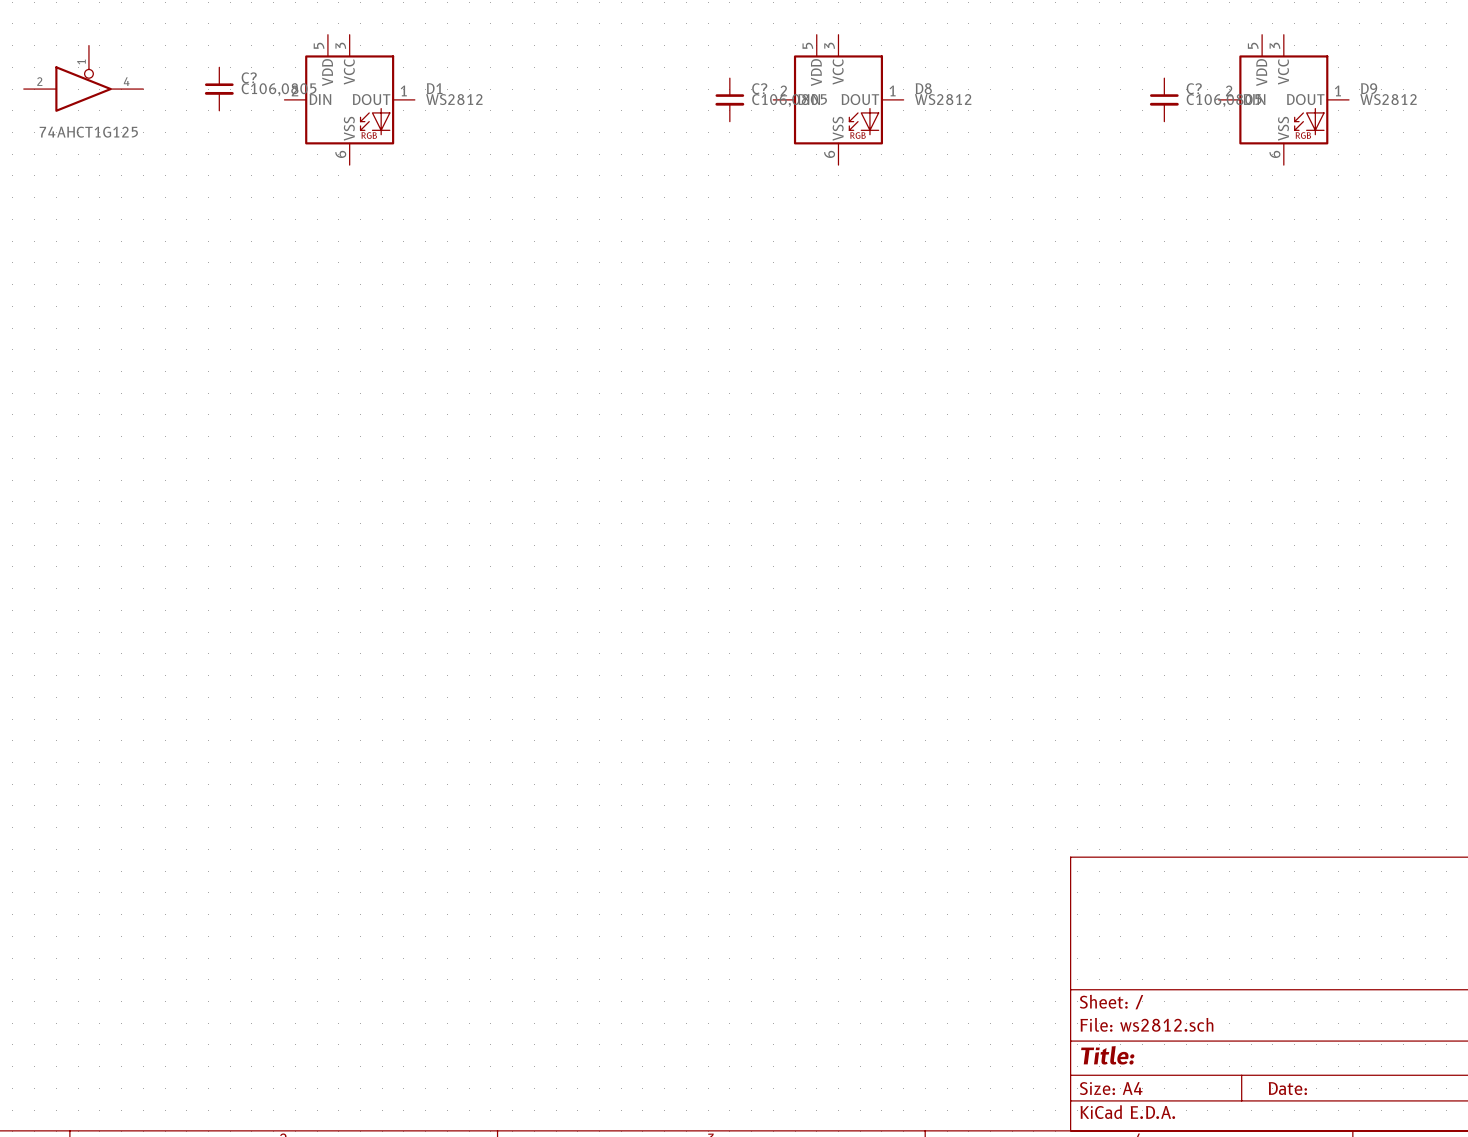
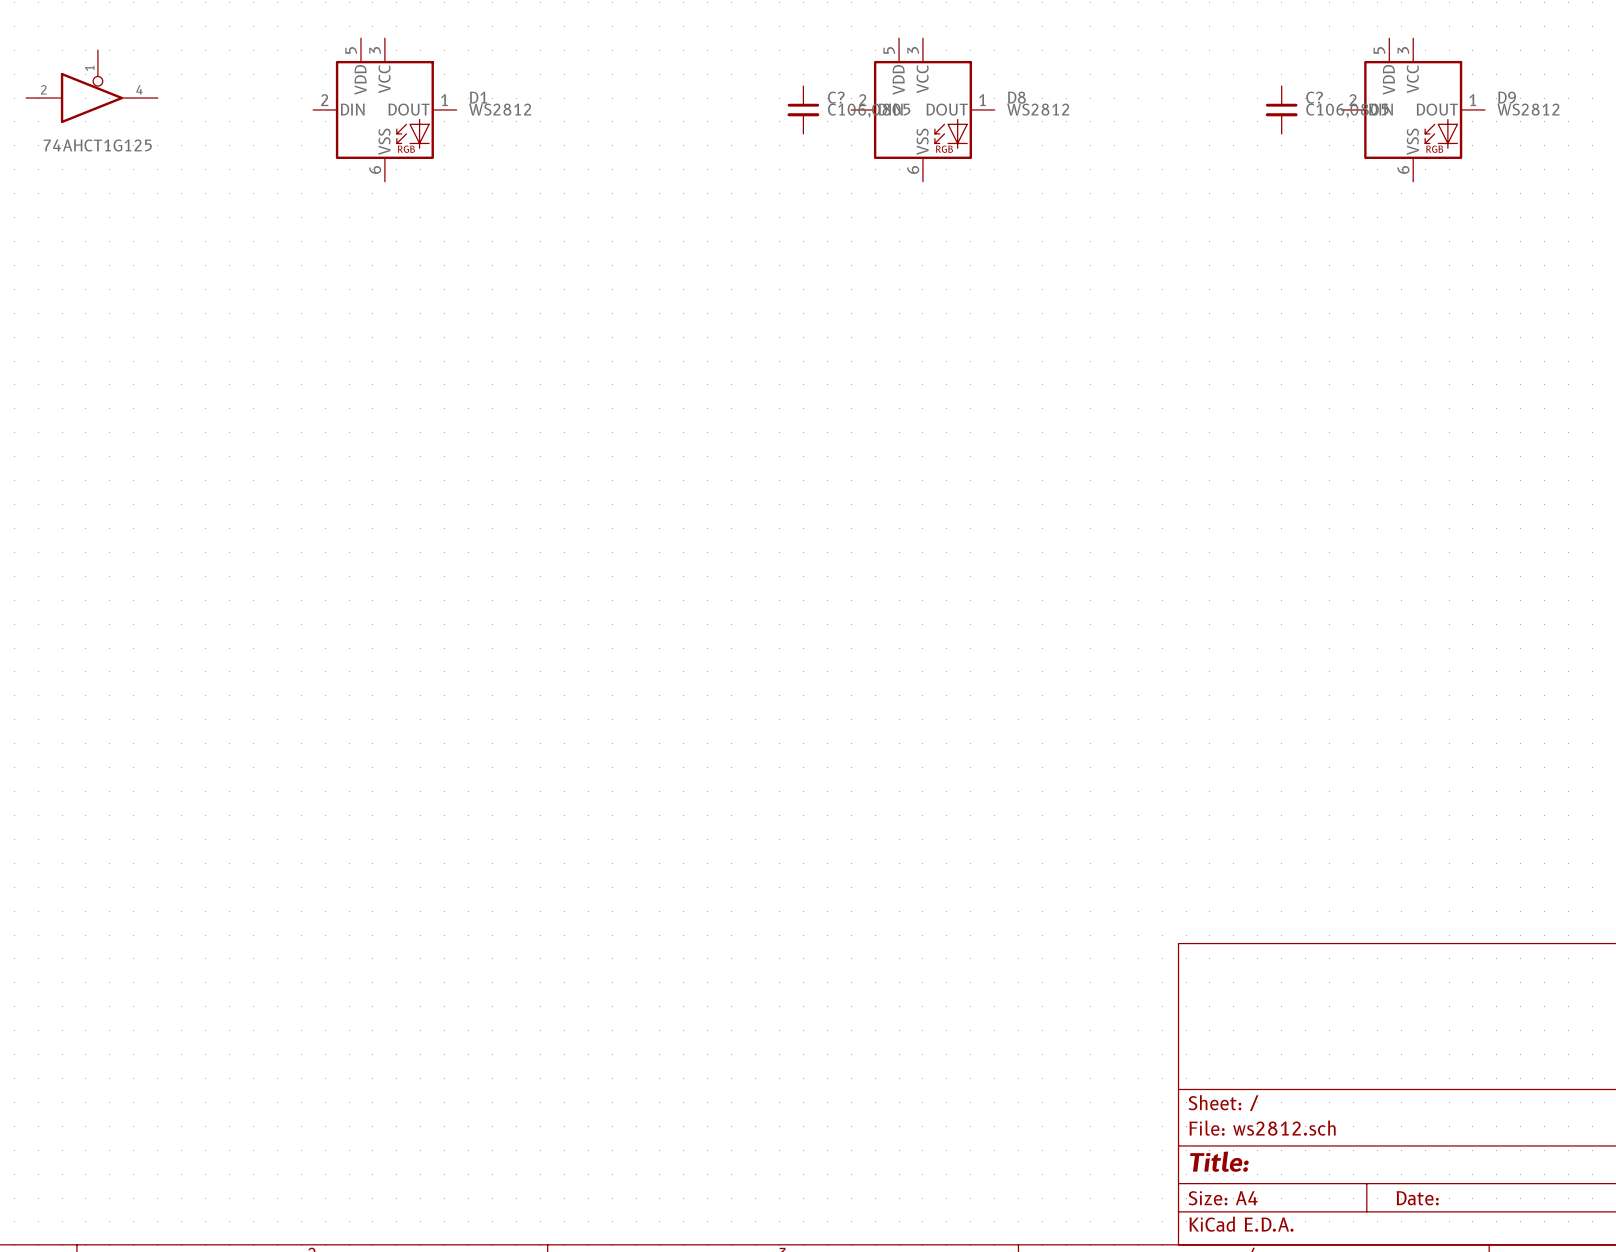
C?: C106,0805 (219, 89) -> none

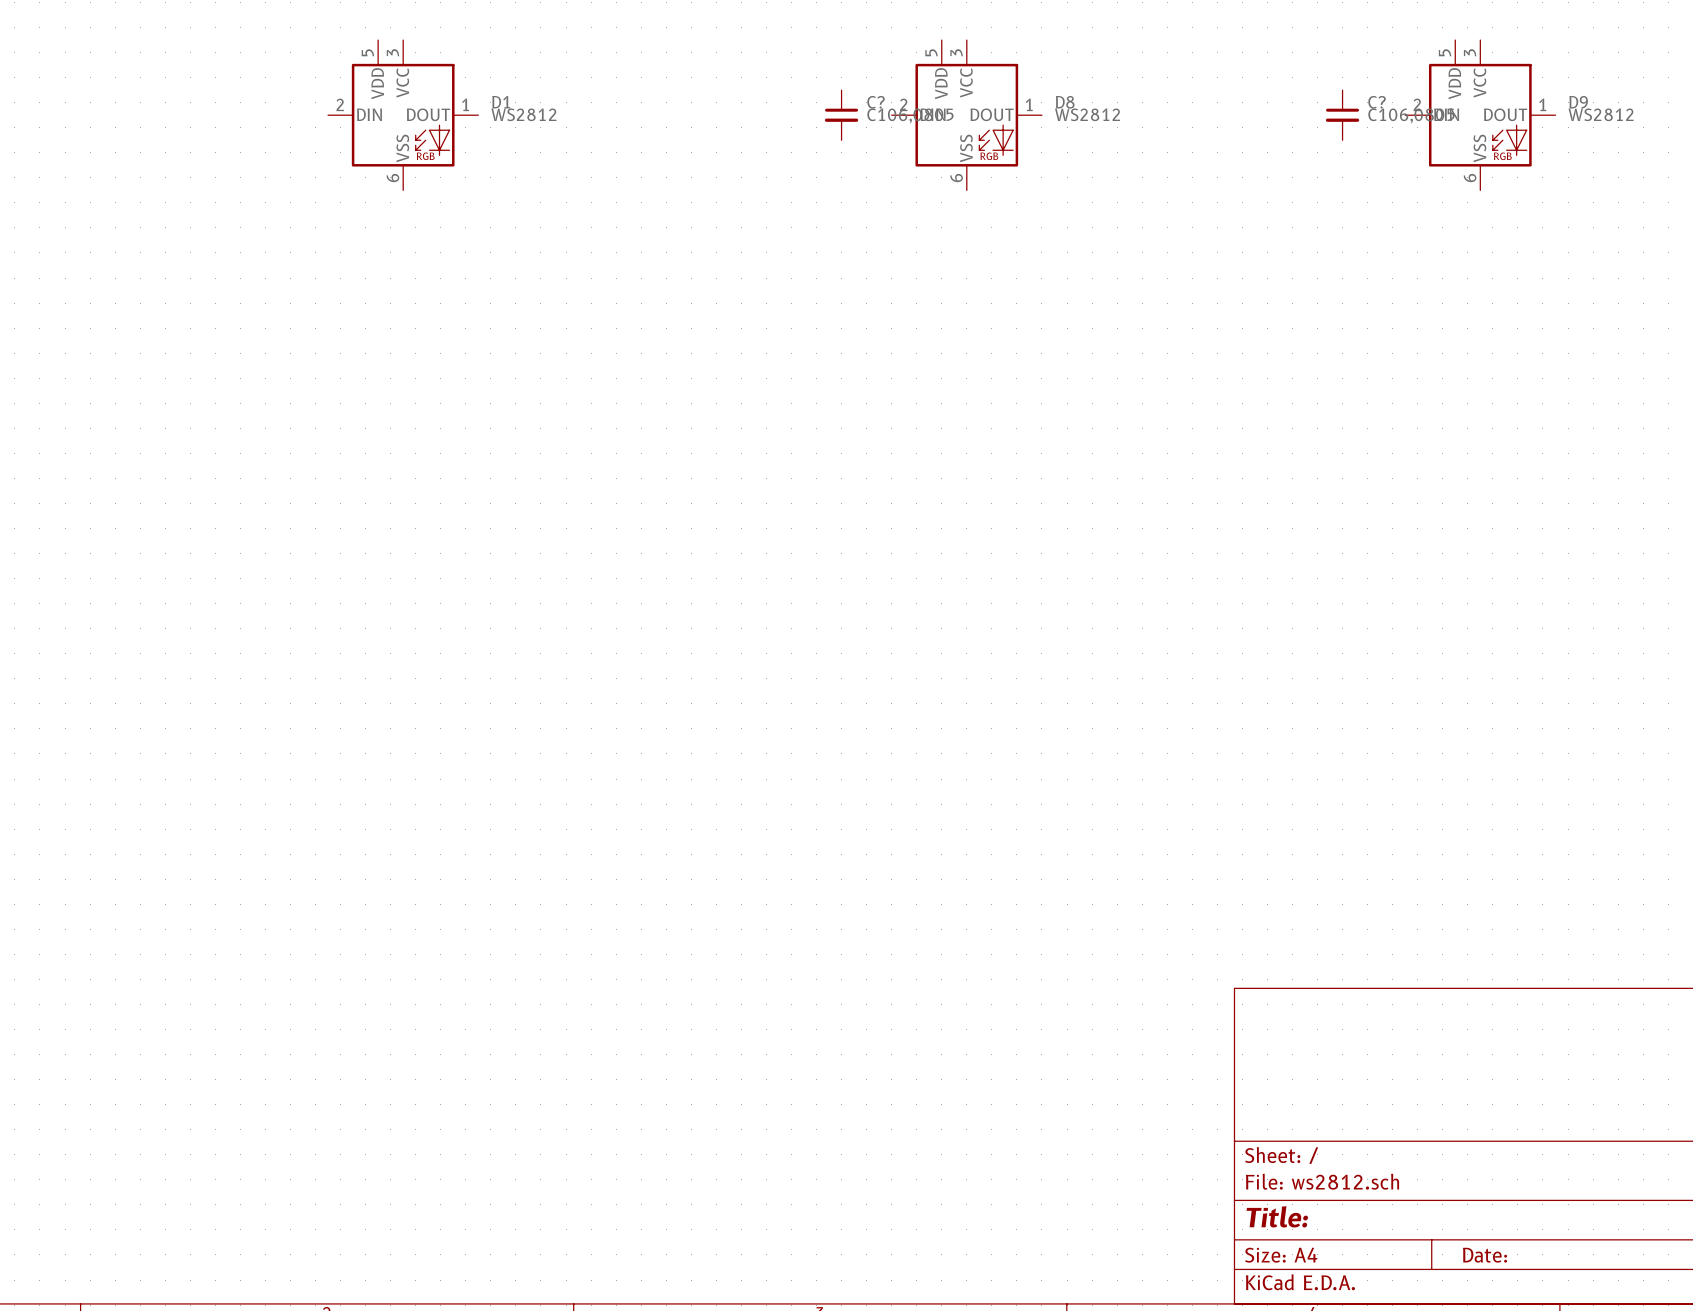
part: 74AHCT1G125 (91, 86) -> none

